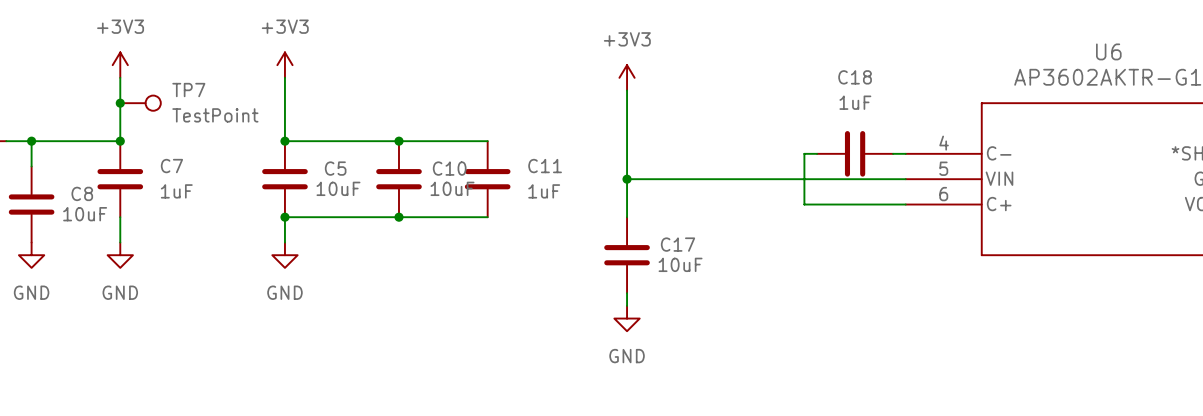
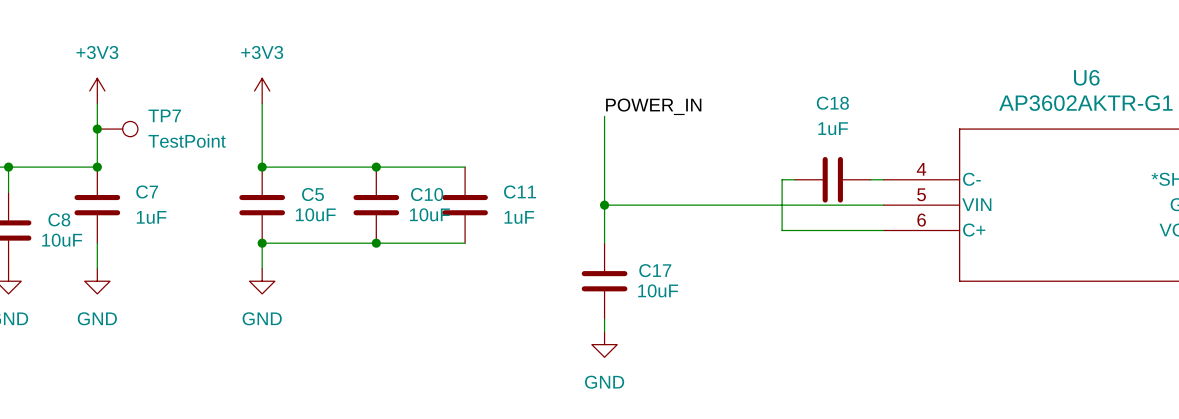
power symbol: +3V3 (627, 77) -> none
label: none -> POWER_IN (653, 106)

